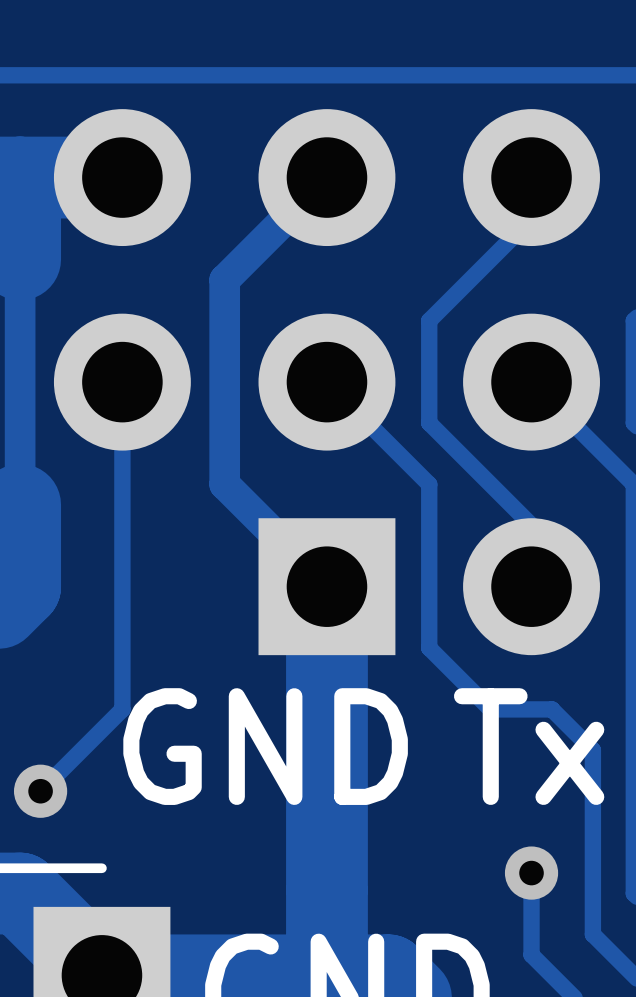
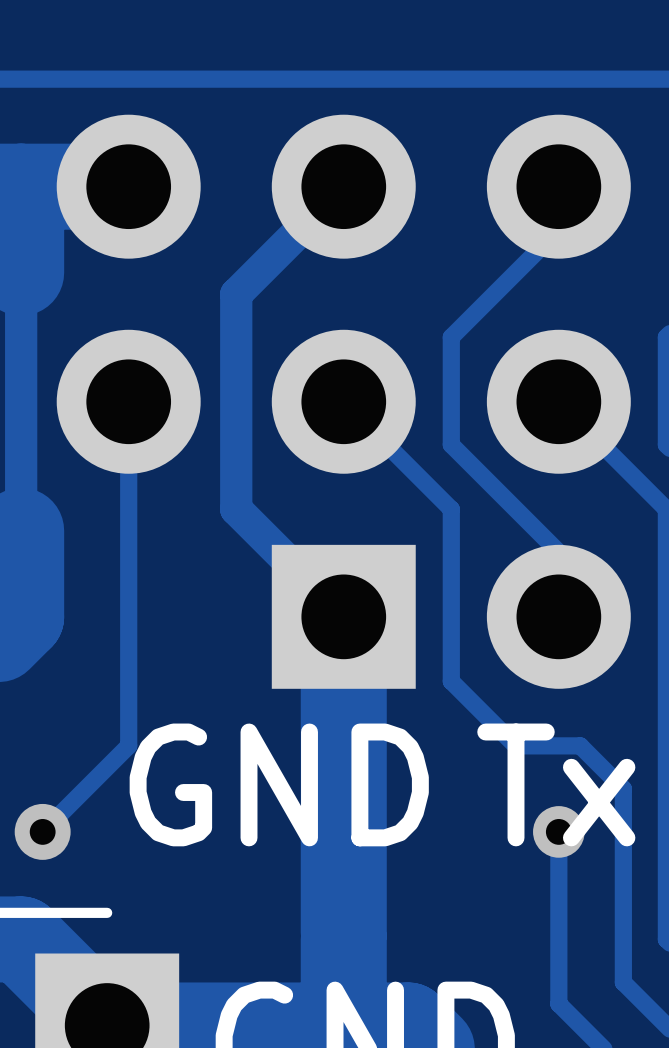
track: none -> (558, 831) (558, 917)
via: none -> (558, 831)
via: (531, 873) -> none

